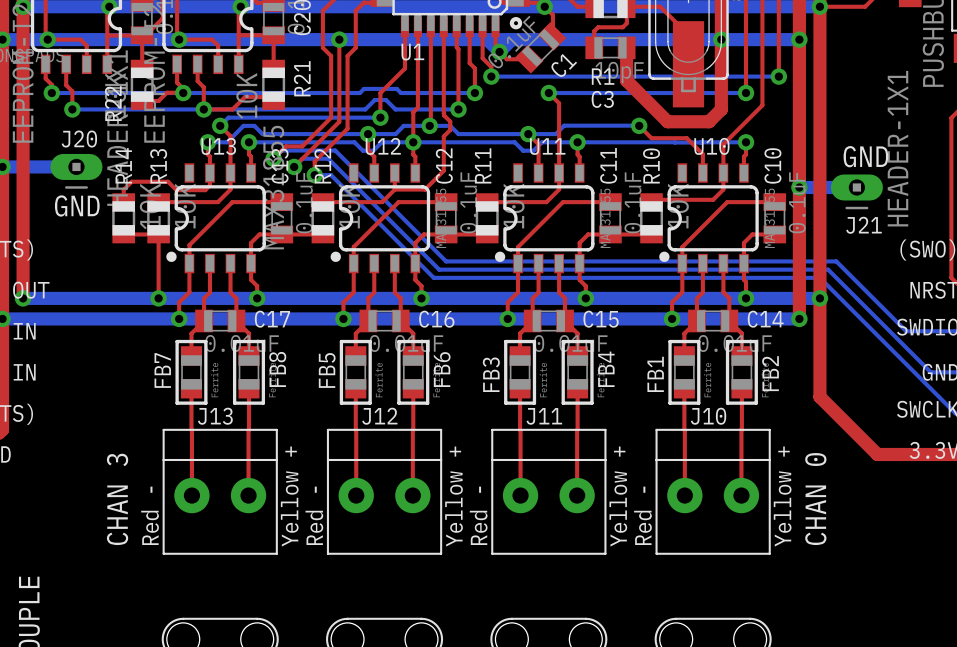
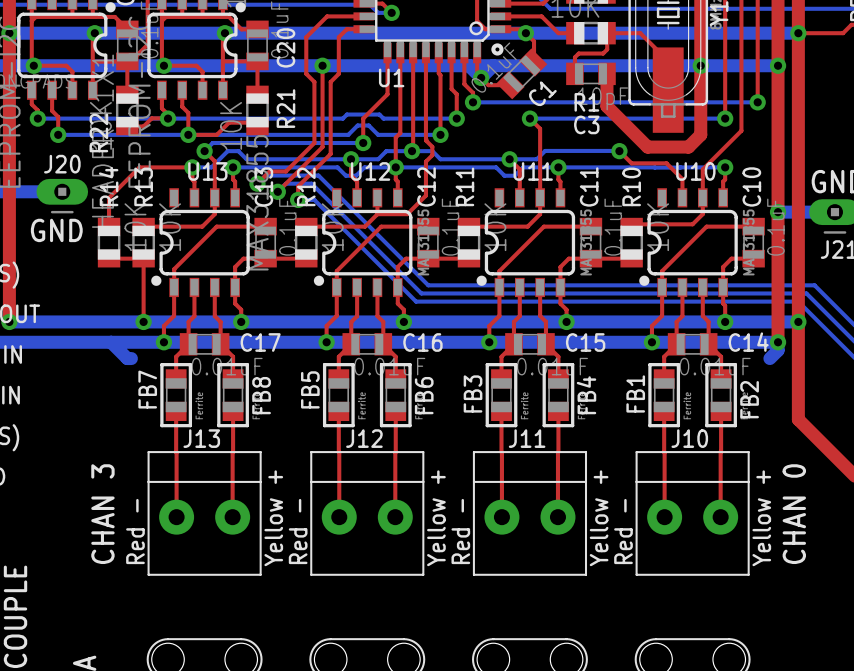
top track: (209, 173) (209, 185) (205, 190) (176, 190) (168, 181) (131, 181) (123, 189) -> (192, 167) (139, 167) (109, 197) (109, 214)
bottom track: none -> (111, 342) (127, 358) (131, 358)
bottom track: none -> (778, 342) (778, 350) (769, 358)

